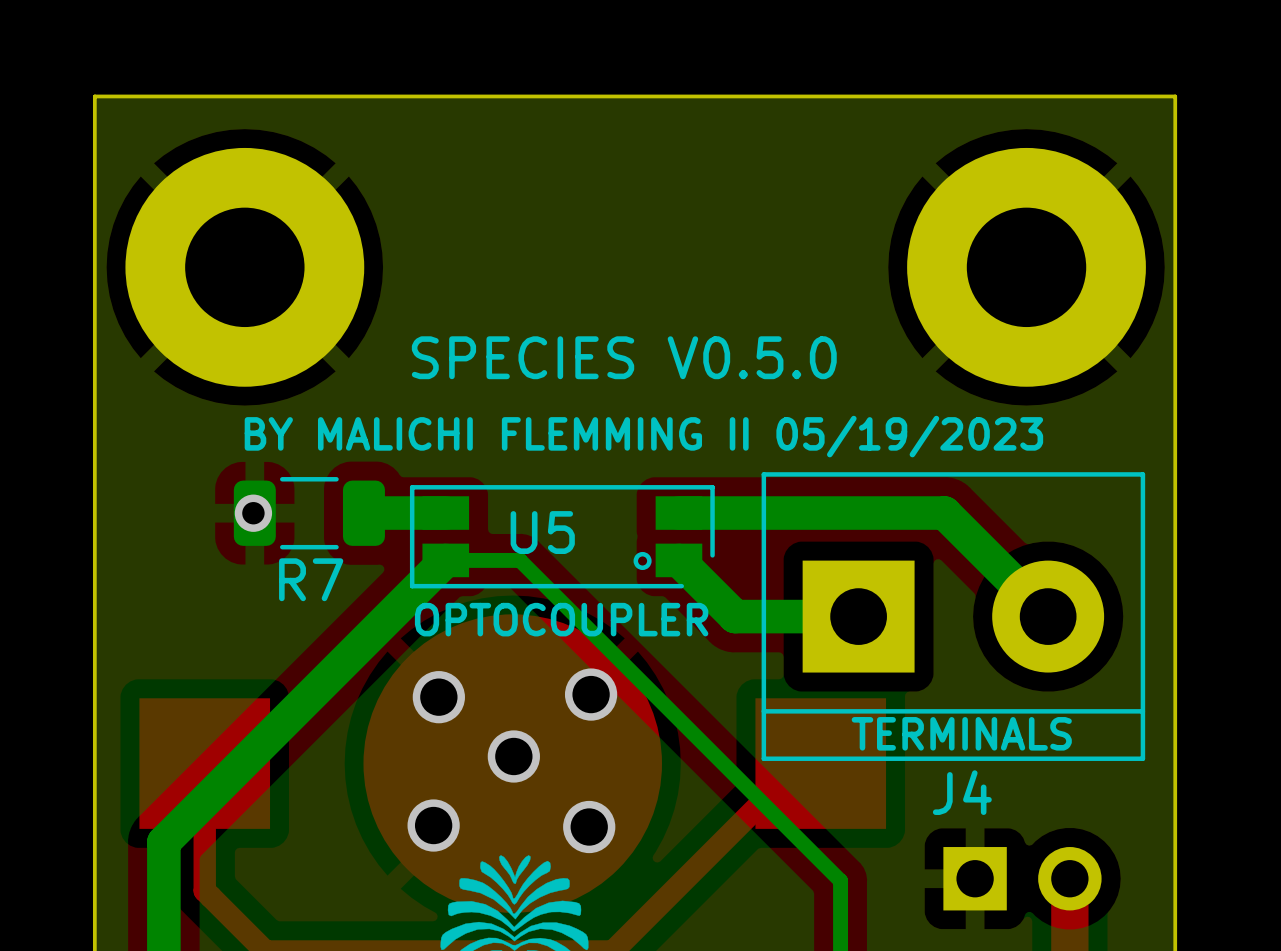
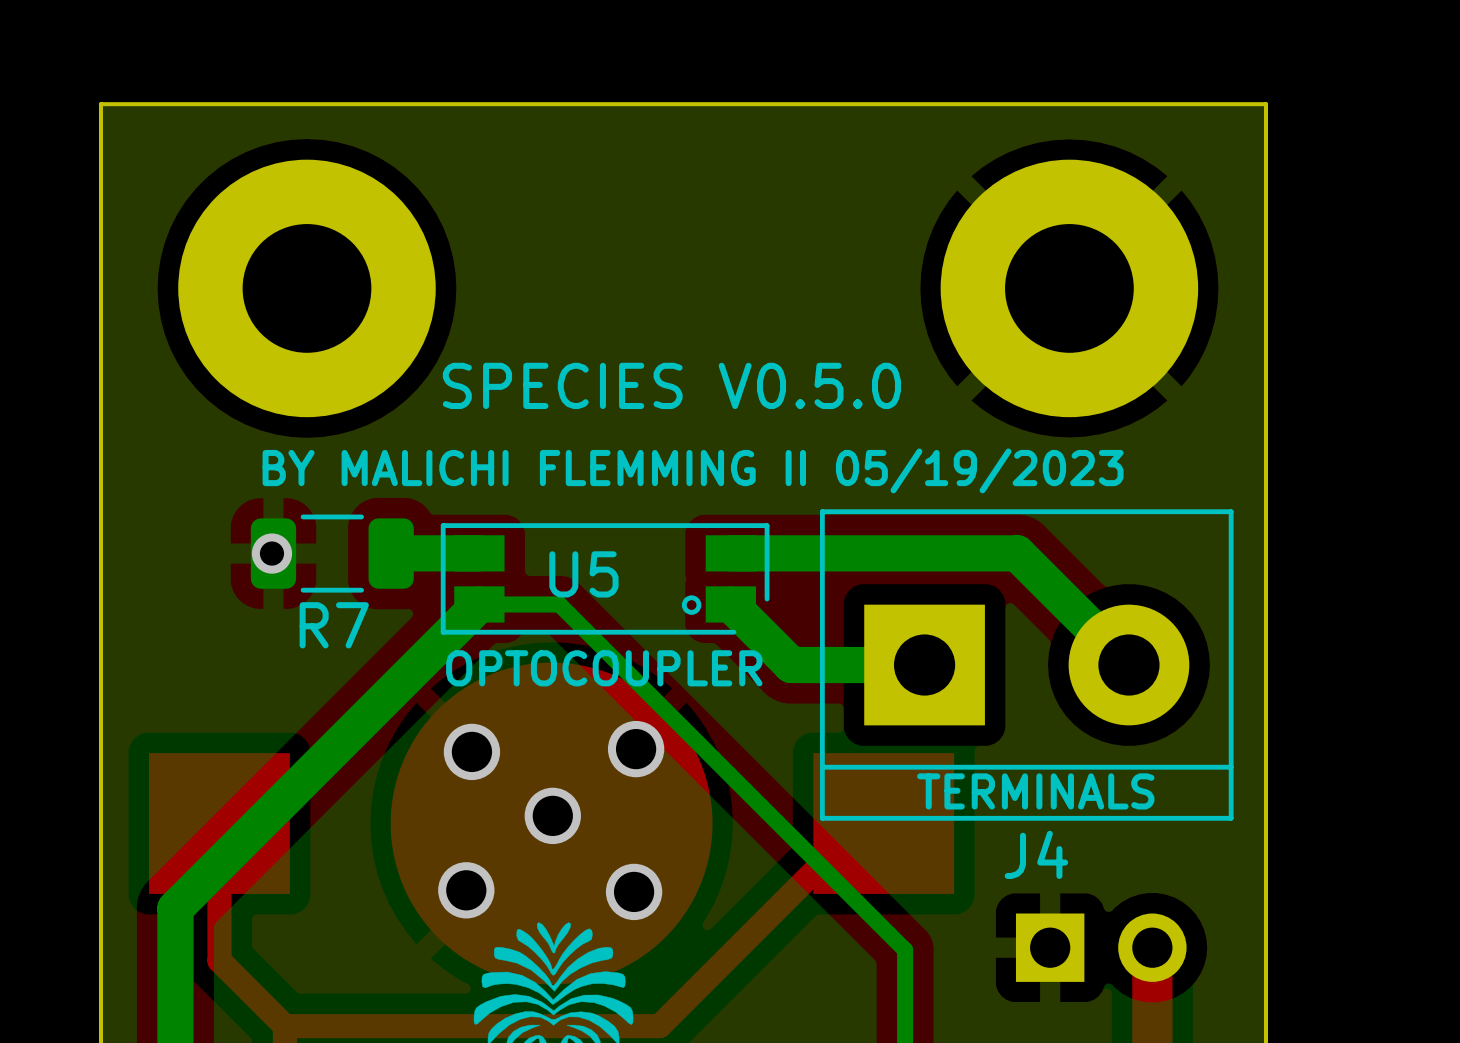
part position: (244, 267) -> (306, 288)
part position: (1026, 267) -> (1069, 288)

